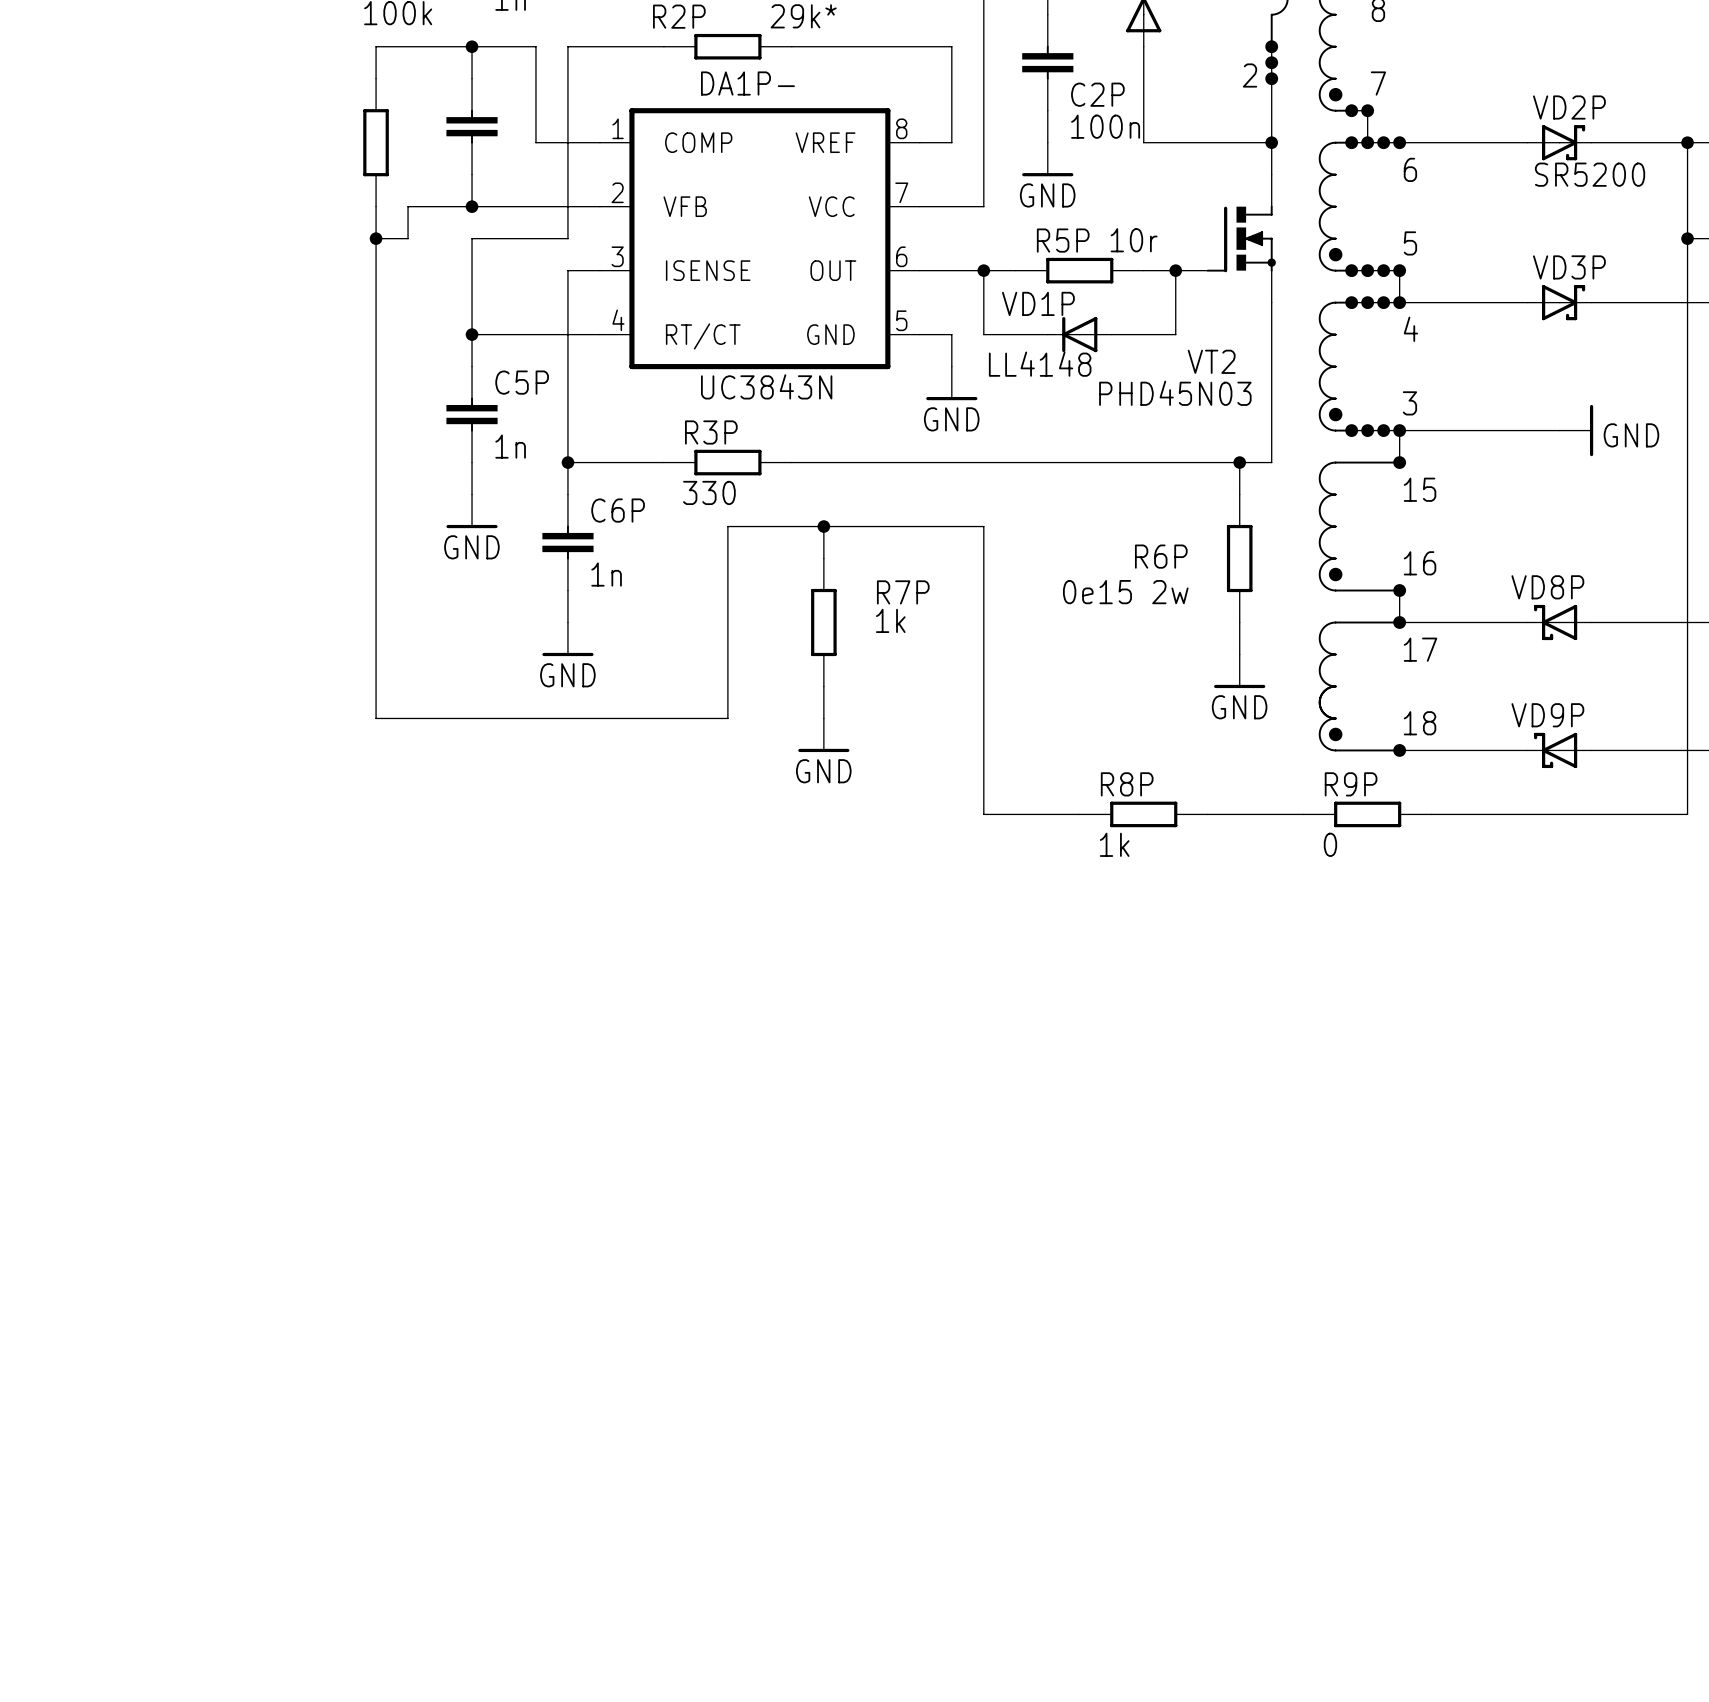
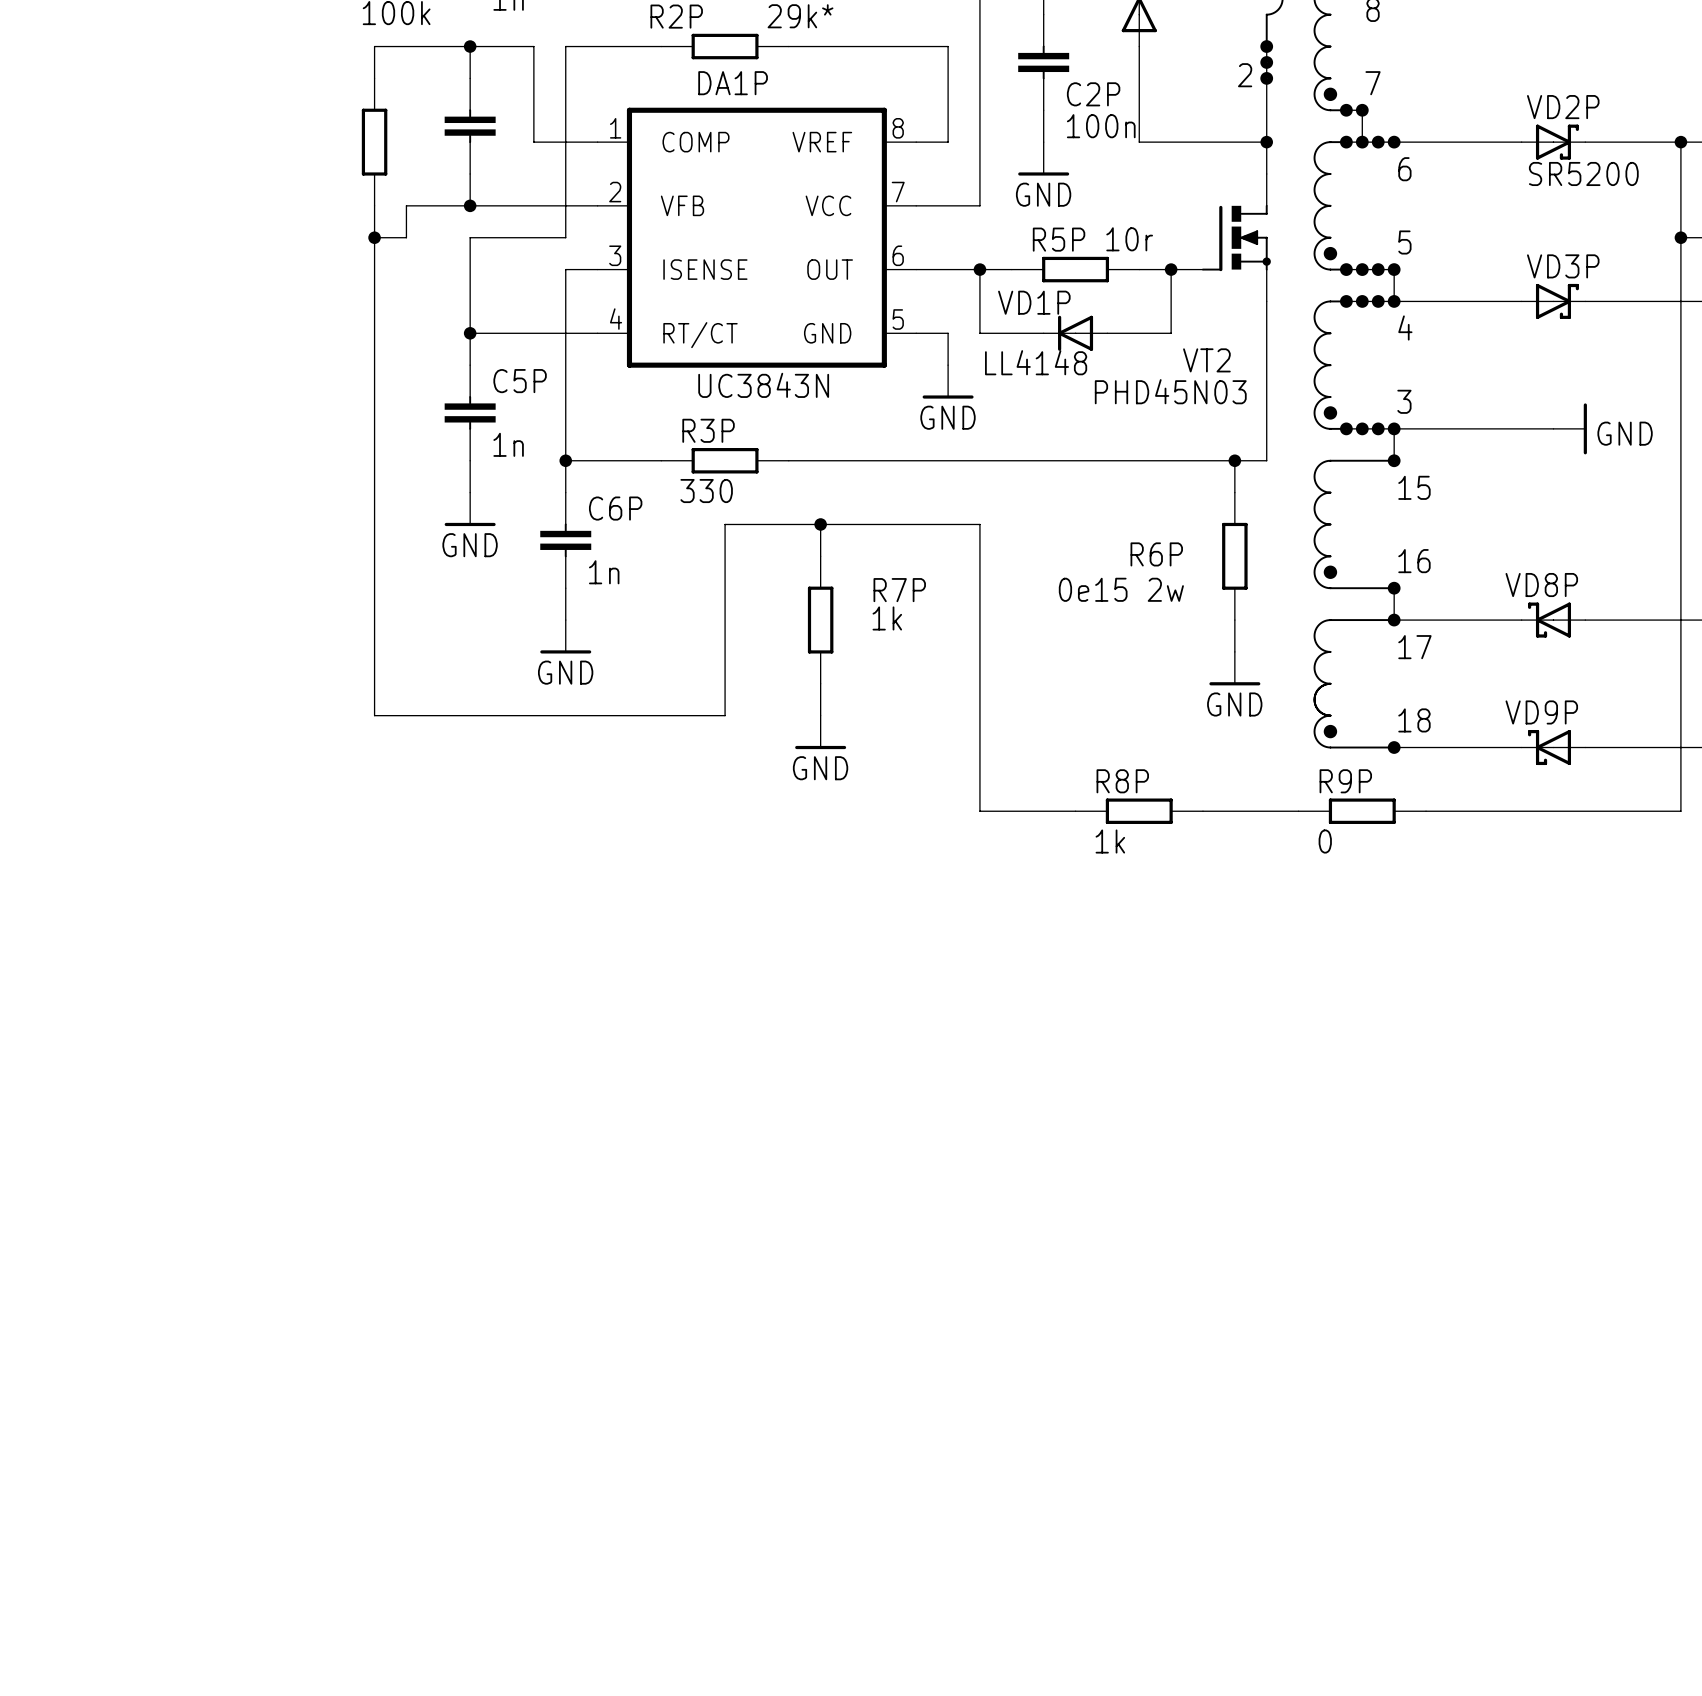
DA1P- name: DA1P- (747, 83) -> DA1P (733, 83)

